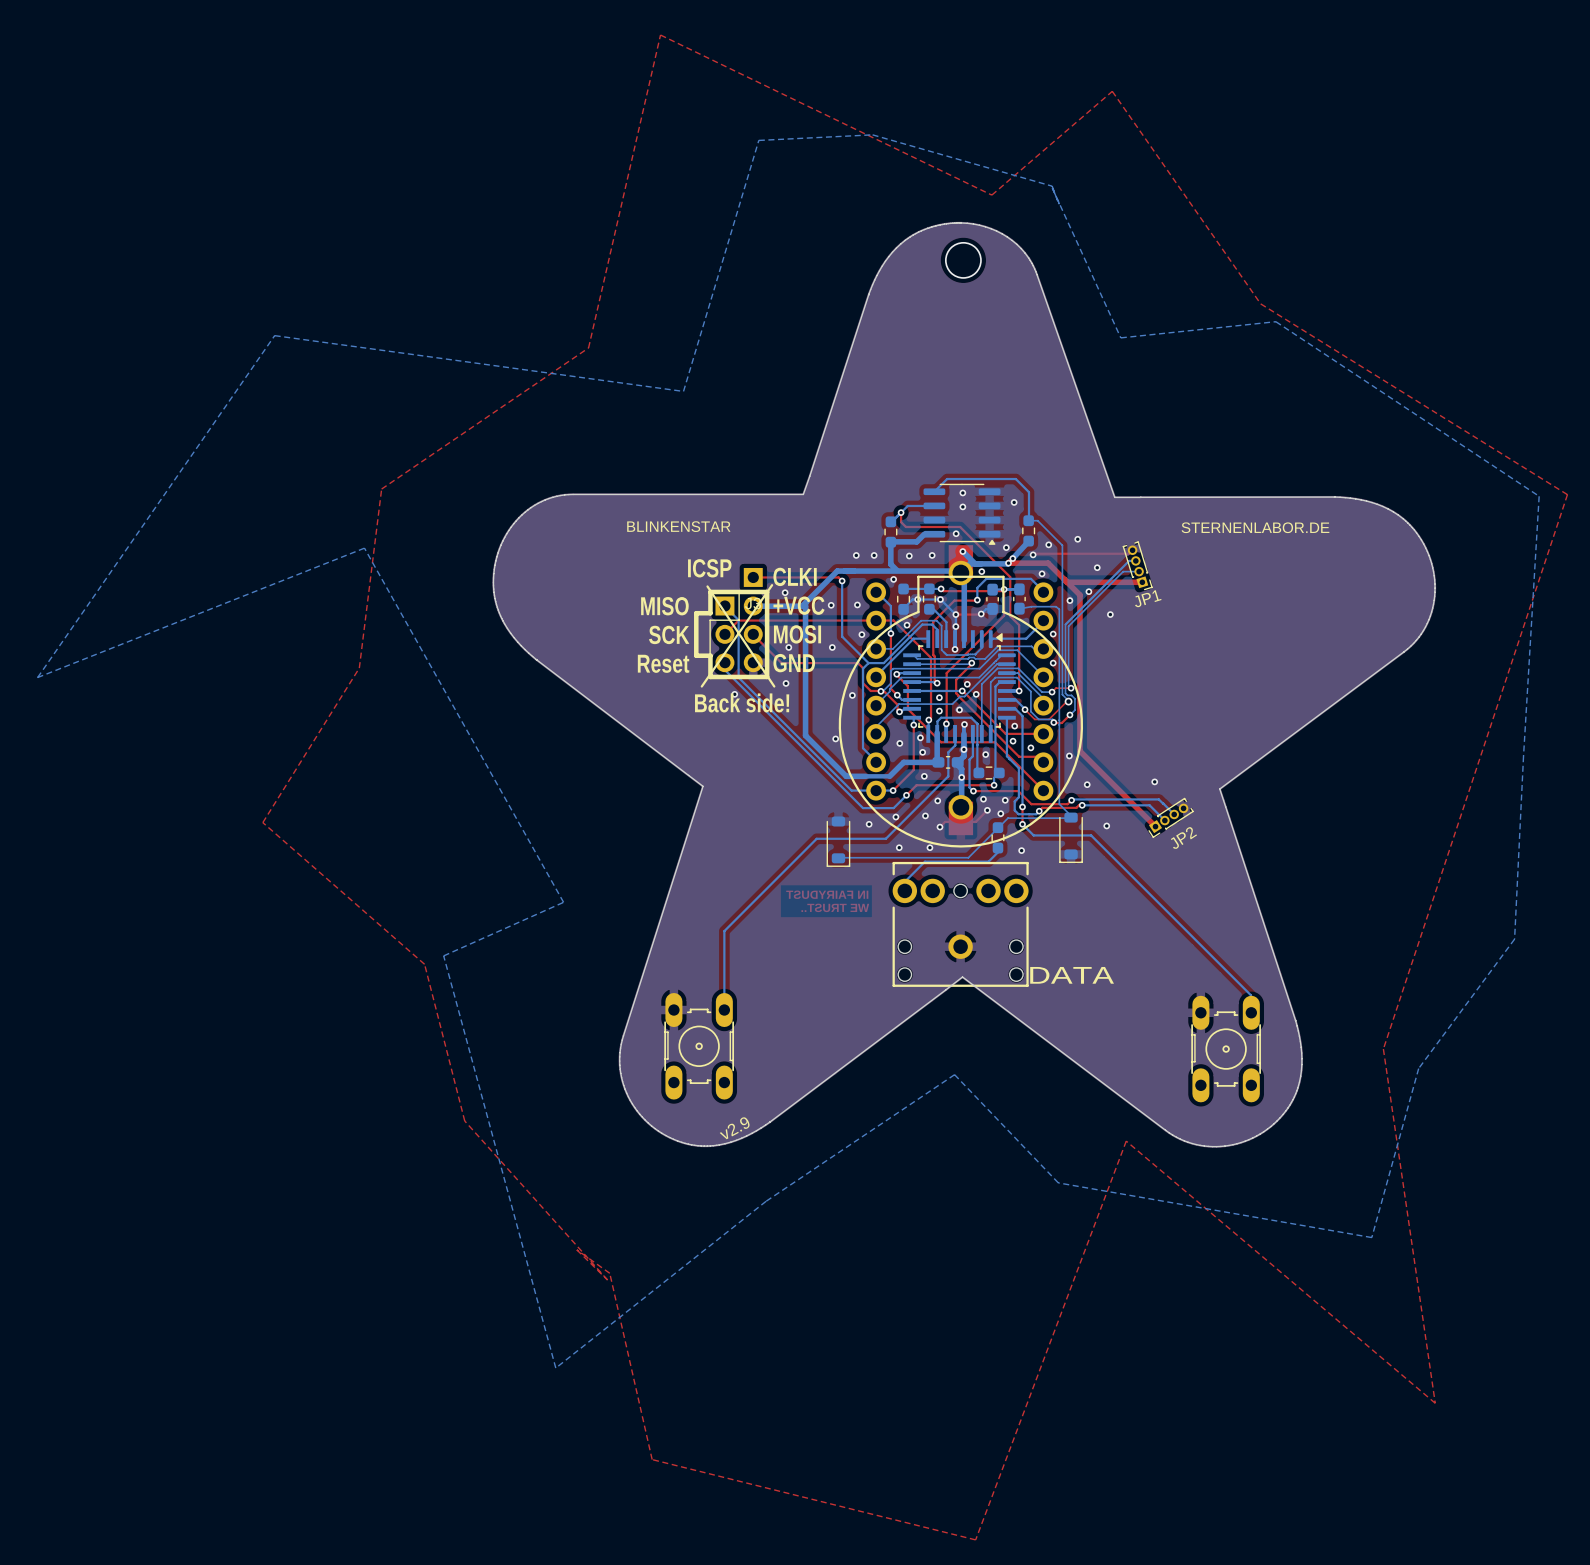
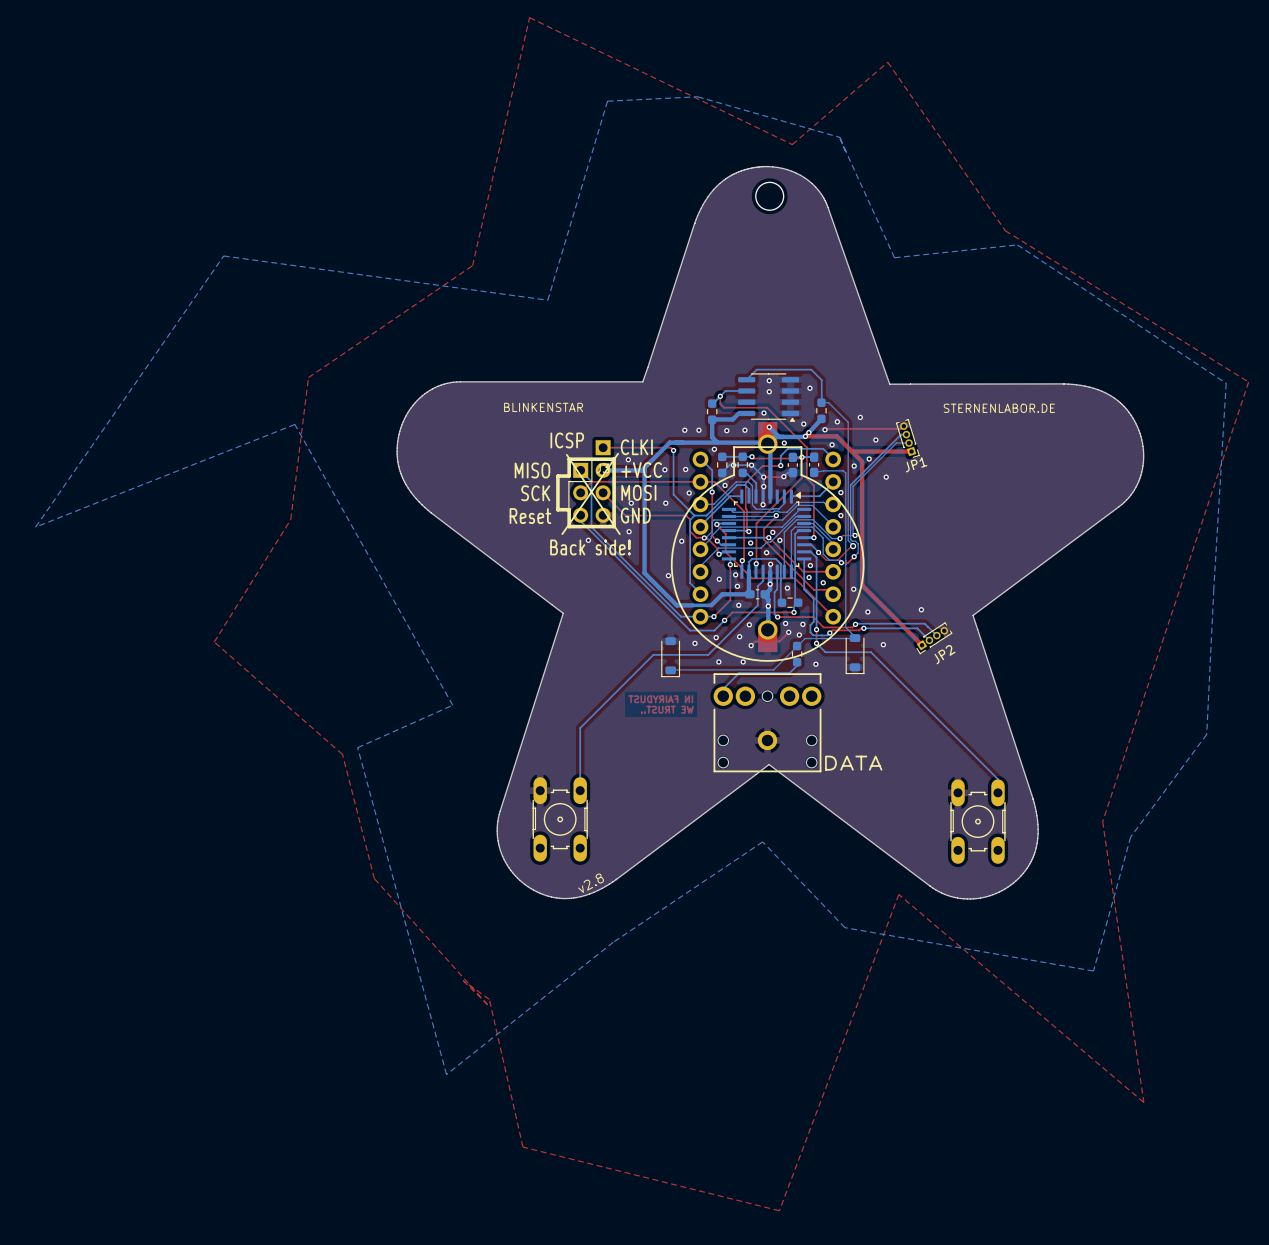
text: v2.9 (734, 1128) -> v2.8 (591, 883)

